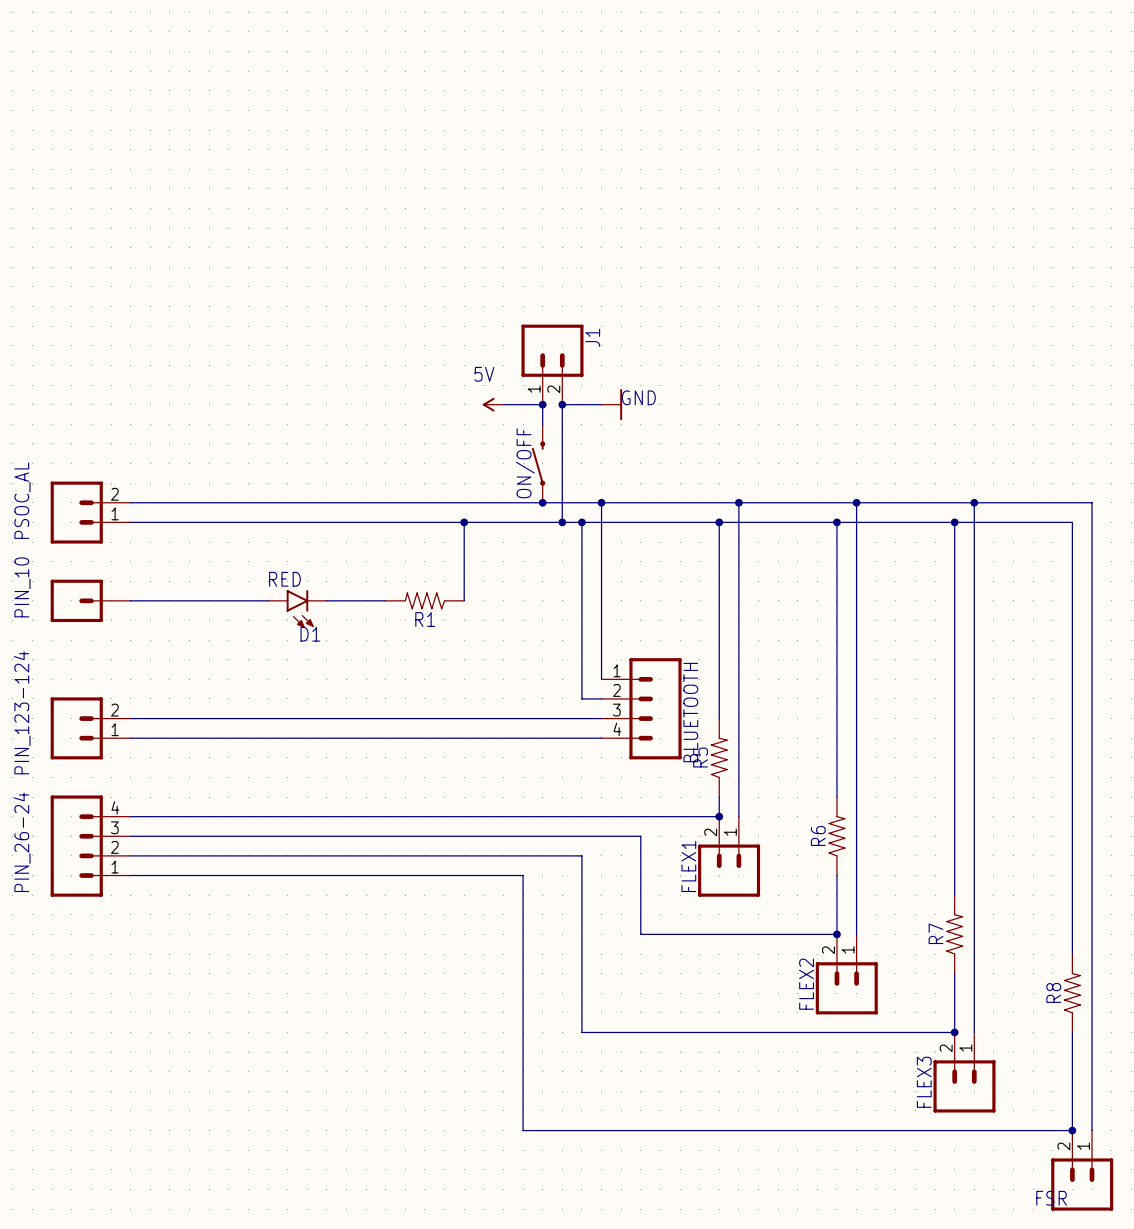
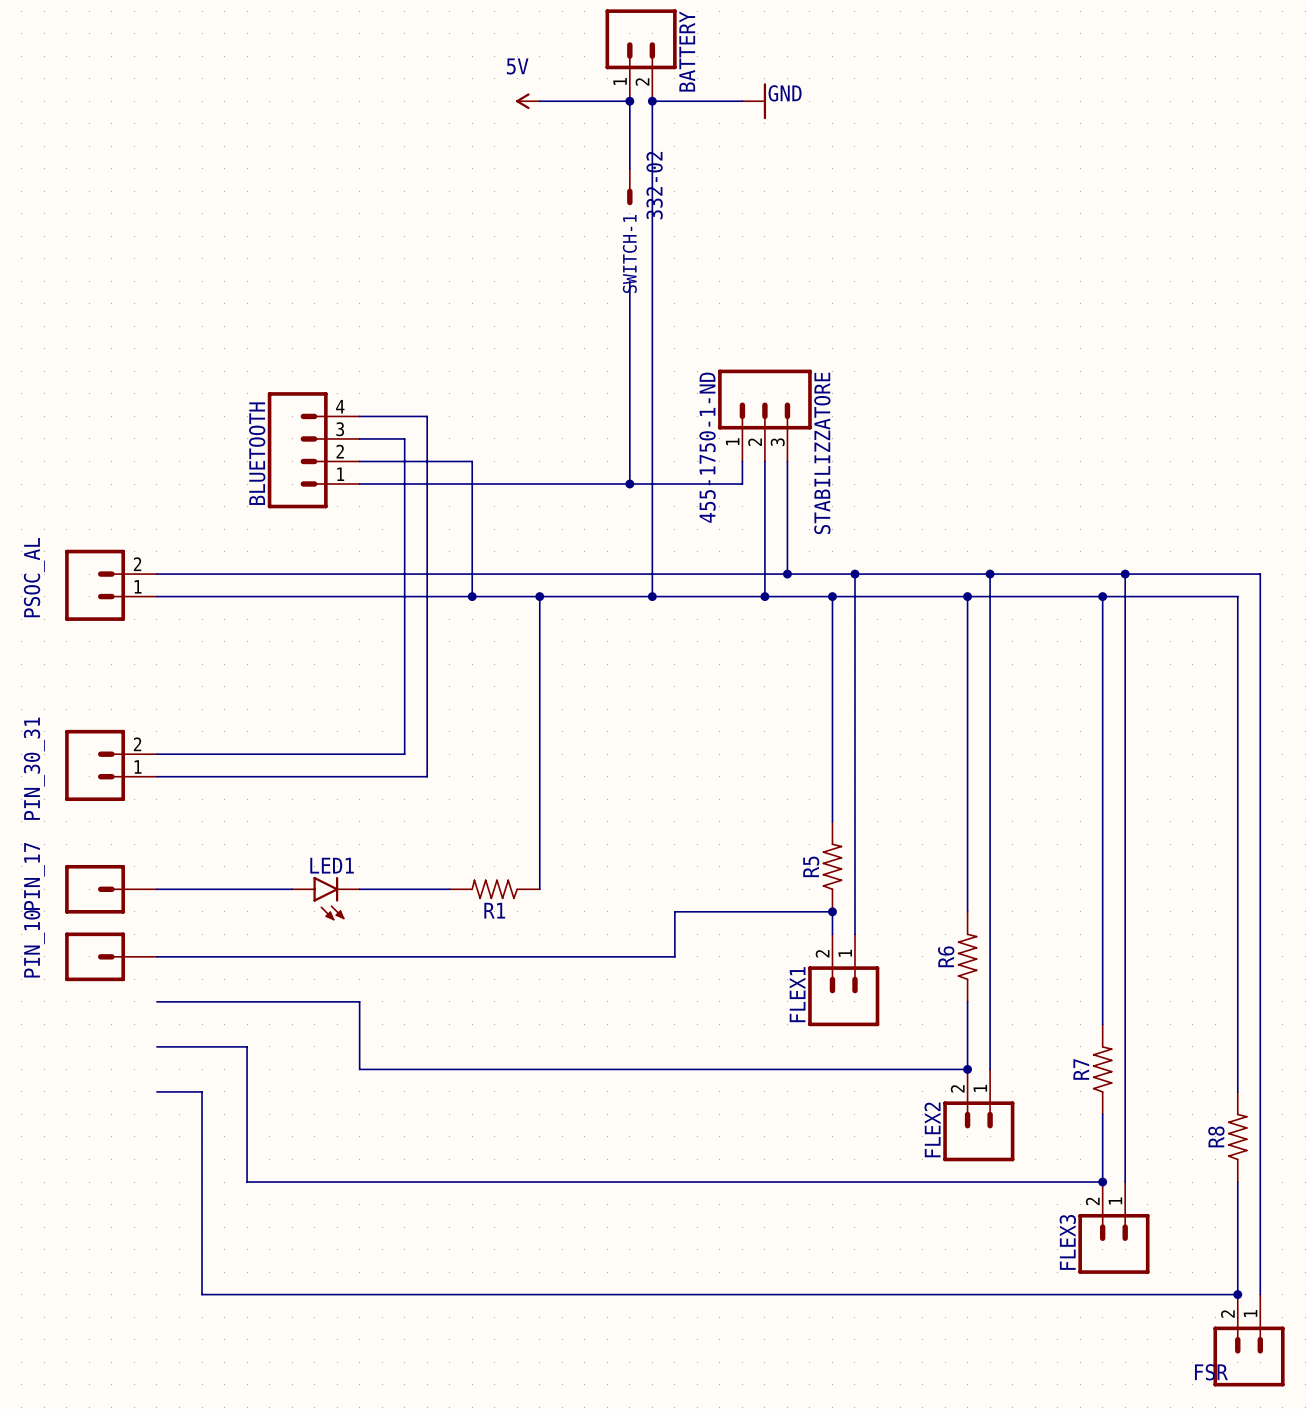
BATTERY: none -> (641, 55)
power symbol: none -> 5V (527, 101)
wire: none -> (539, 101) (629, 101) (629, 168)
junction: none -> (629, 101)
junction: none -> (652, 101)
power symbol: none -> GND (754, 101)
SWITCH-1: none -> 332-02 (629, 187)
J1: (552, 364) -> none
STABILIZZATORE: none -> 455-1750-1-ND (764, 415)
wire: none -> (359, 416) (427, 416) (427, 776) (156, 776)
wire: none -> (359, 438) (404, 438) (404, 754) (156, 754)
BLUETOOTH: none -> (313, 450)
wire: none -> (359, 461) (472, 461) (472, 596)
power symbol: 5V (493, 404) -> none
wire: (503, 404) (542, 404) -> (629, 281) (629, 461)
junction: (542, 404) -> none
wire: (562, 404) (601, 404) -> (652, 461) (652, 101) (742, 101)
junction: (562, 404) -> none
power symbol: GND (611, 404) -> none
wire: none -> (742, 461) (742, 484) (359, 484)
wire: none -> (764, 461) (764, 596)
wire: none -> (787, 461) (787, 574)
junction: none -> (629, 484)
ON/OFF: (538, 463) -> none
junction: (542, 502) -> none
wire: (601, 502) (601, 679) -> (539, 686) (539, 889)
junction: (601, 502) -> none
junction: none -> (787, 574)
junction: none -> (472, 596)
wire: (581, 522) (581, 698) (601, 698) -> none
junction: (581, 522) -> none
junction: none -> (764, 596)
PIN_10 position: (90, 600) -> (111, 956)
wire: (130, 600) (268, 600) -> none
wire: (326, 600) (385, 600) -> none
R1 position: (424, 600) -> (494, 889)
D1: RED (297, 609) -> none
PIN_30_31: none -> (111, 765)
BLUETOOTH: (641, 708) -> none
wire: (130, 718) (601, 718) -> none
PIN_123-124: (90, 728) -> none
wire: (130, 738) (601, 738) -> none
PIN_17: none -> (111, 889)
wire: none -> (156, 889) (292, 889)
wire: none -> (359, 889) (449, 889)
LED1: none -> (325, 898)
wire: (130, 816) (719, 816) -> none
junction position: (719, 816) -> (832, 911)
wire: (581, 836) (640, 836) (640, 934) -> (674, 956) (674, 911) (832, 911)
PIN_26-24: (90, 846) -> none
wire: (130, 855) (581, 855) (581, 1032) -> (156, 1046) (247, 1046) (247, 1182) (674, 1182)
wire: (307, 875) (523, 875) (523, 1130) -> (156, 1091) (202, 1091) (202, 1294) (607, 1294)
wire: none -> (359, 1001) (359, 1069) (742, 1069)

